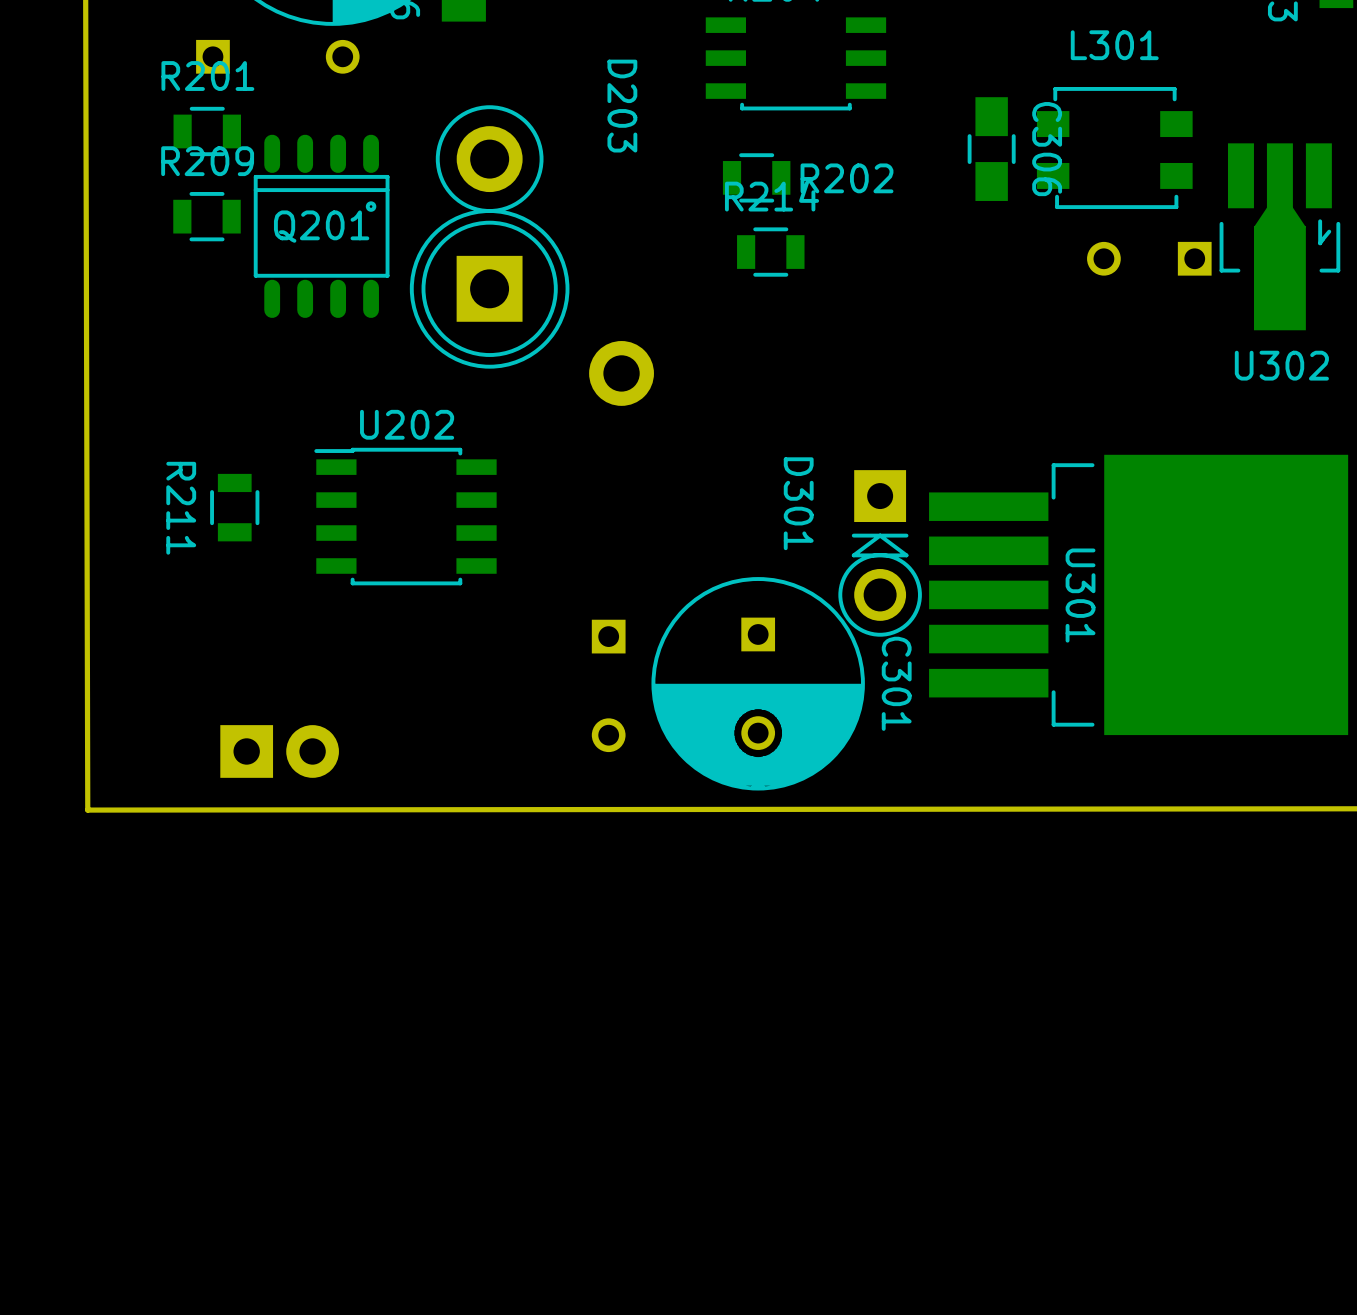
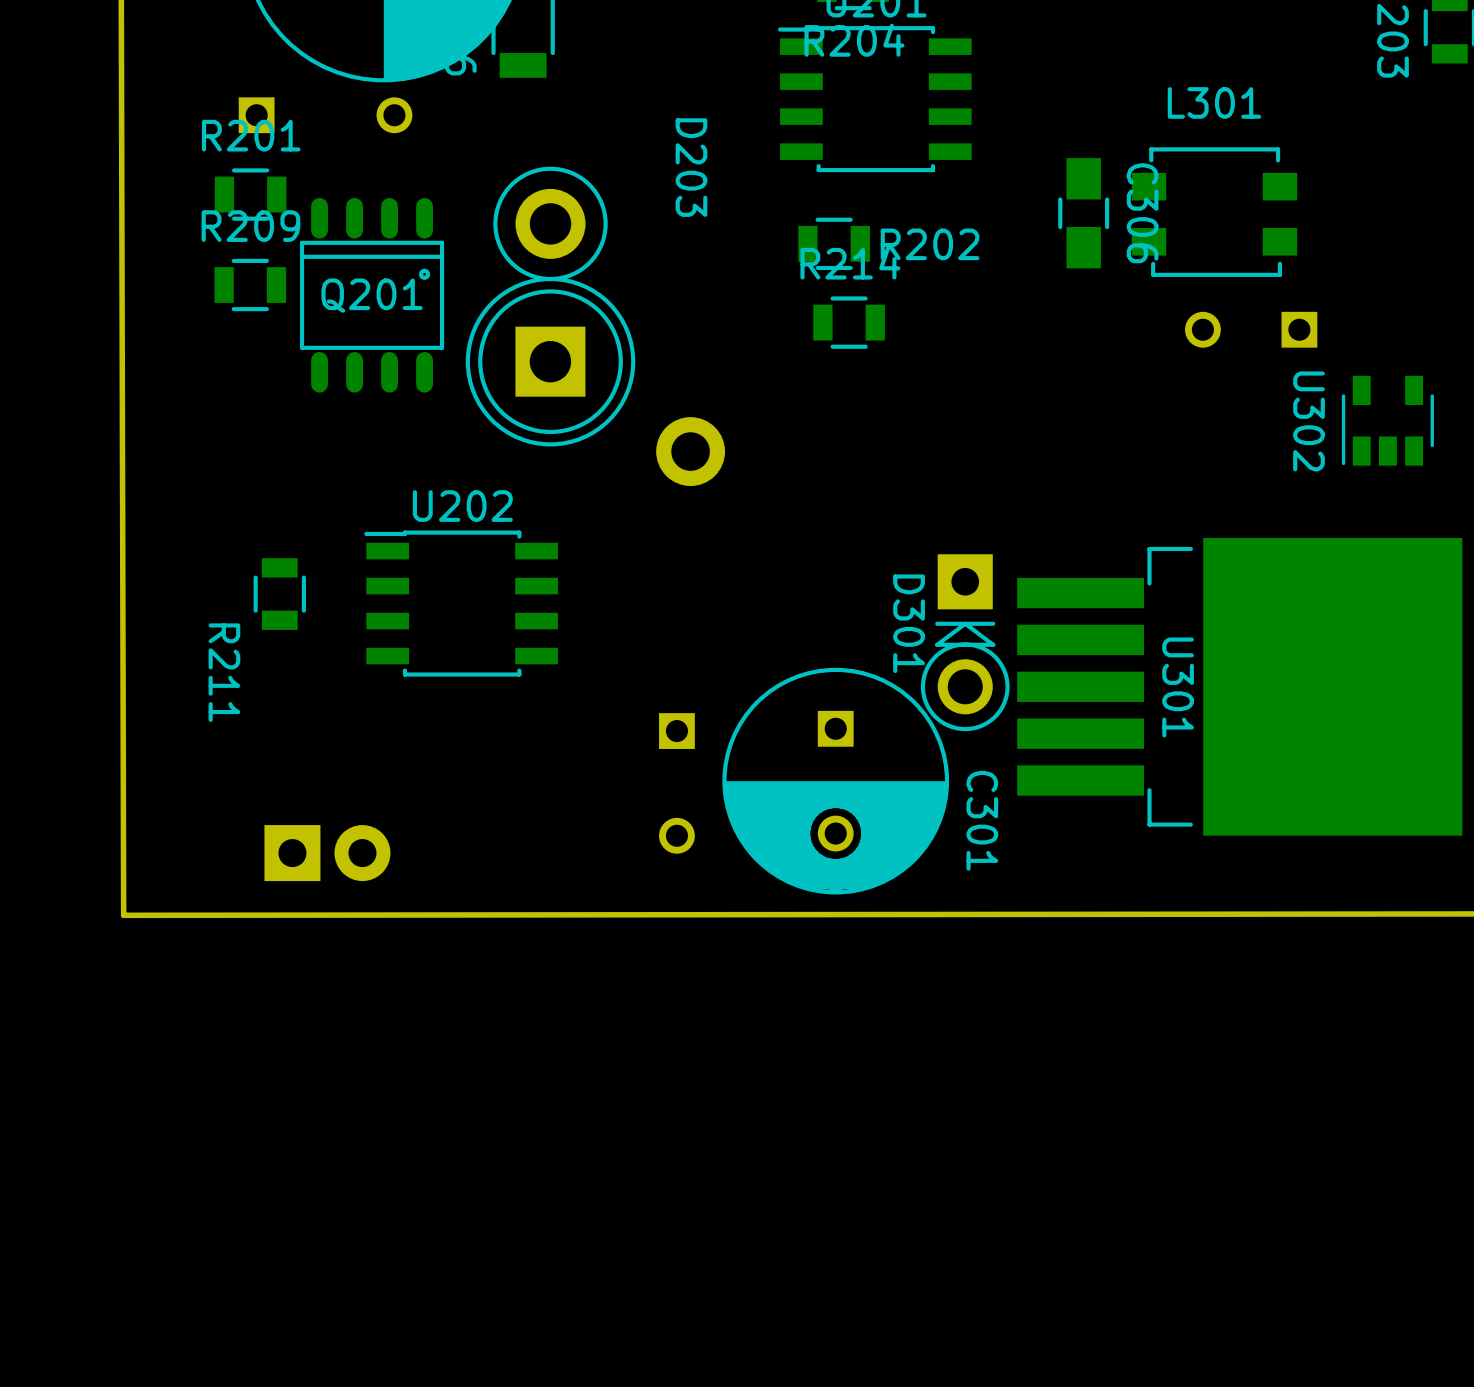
U302 footprint: [1219, 143, 1341, 331] -> [1341, 375, 1434, 466]
U302 name position: U302 (1281, 365) -> U302 (1309, 421)
D301 name position: D301 (798, 503) -> D301 (909, 623)
R211 name position: R211 (181, 508) -> R211 (224, 672)
C301 name position: C301 (896, 683) -> C301 (982, 820)

